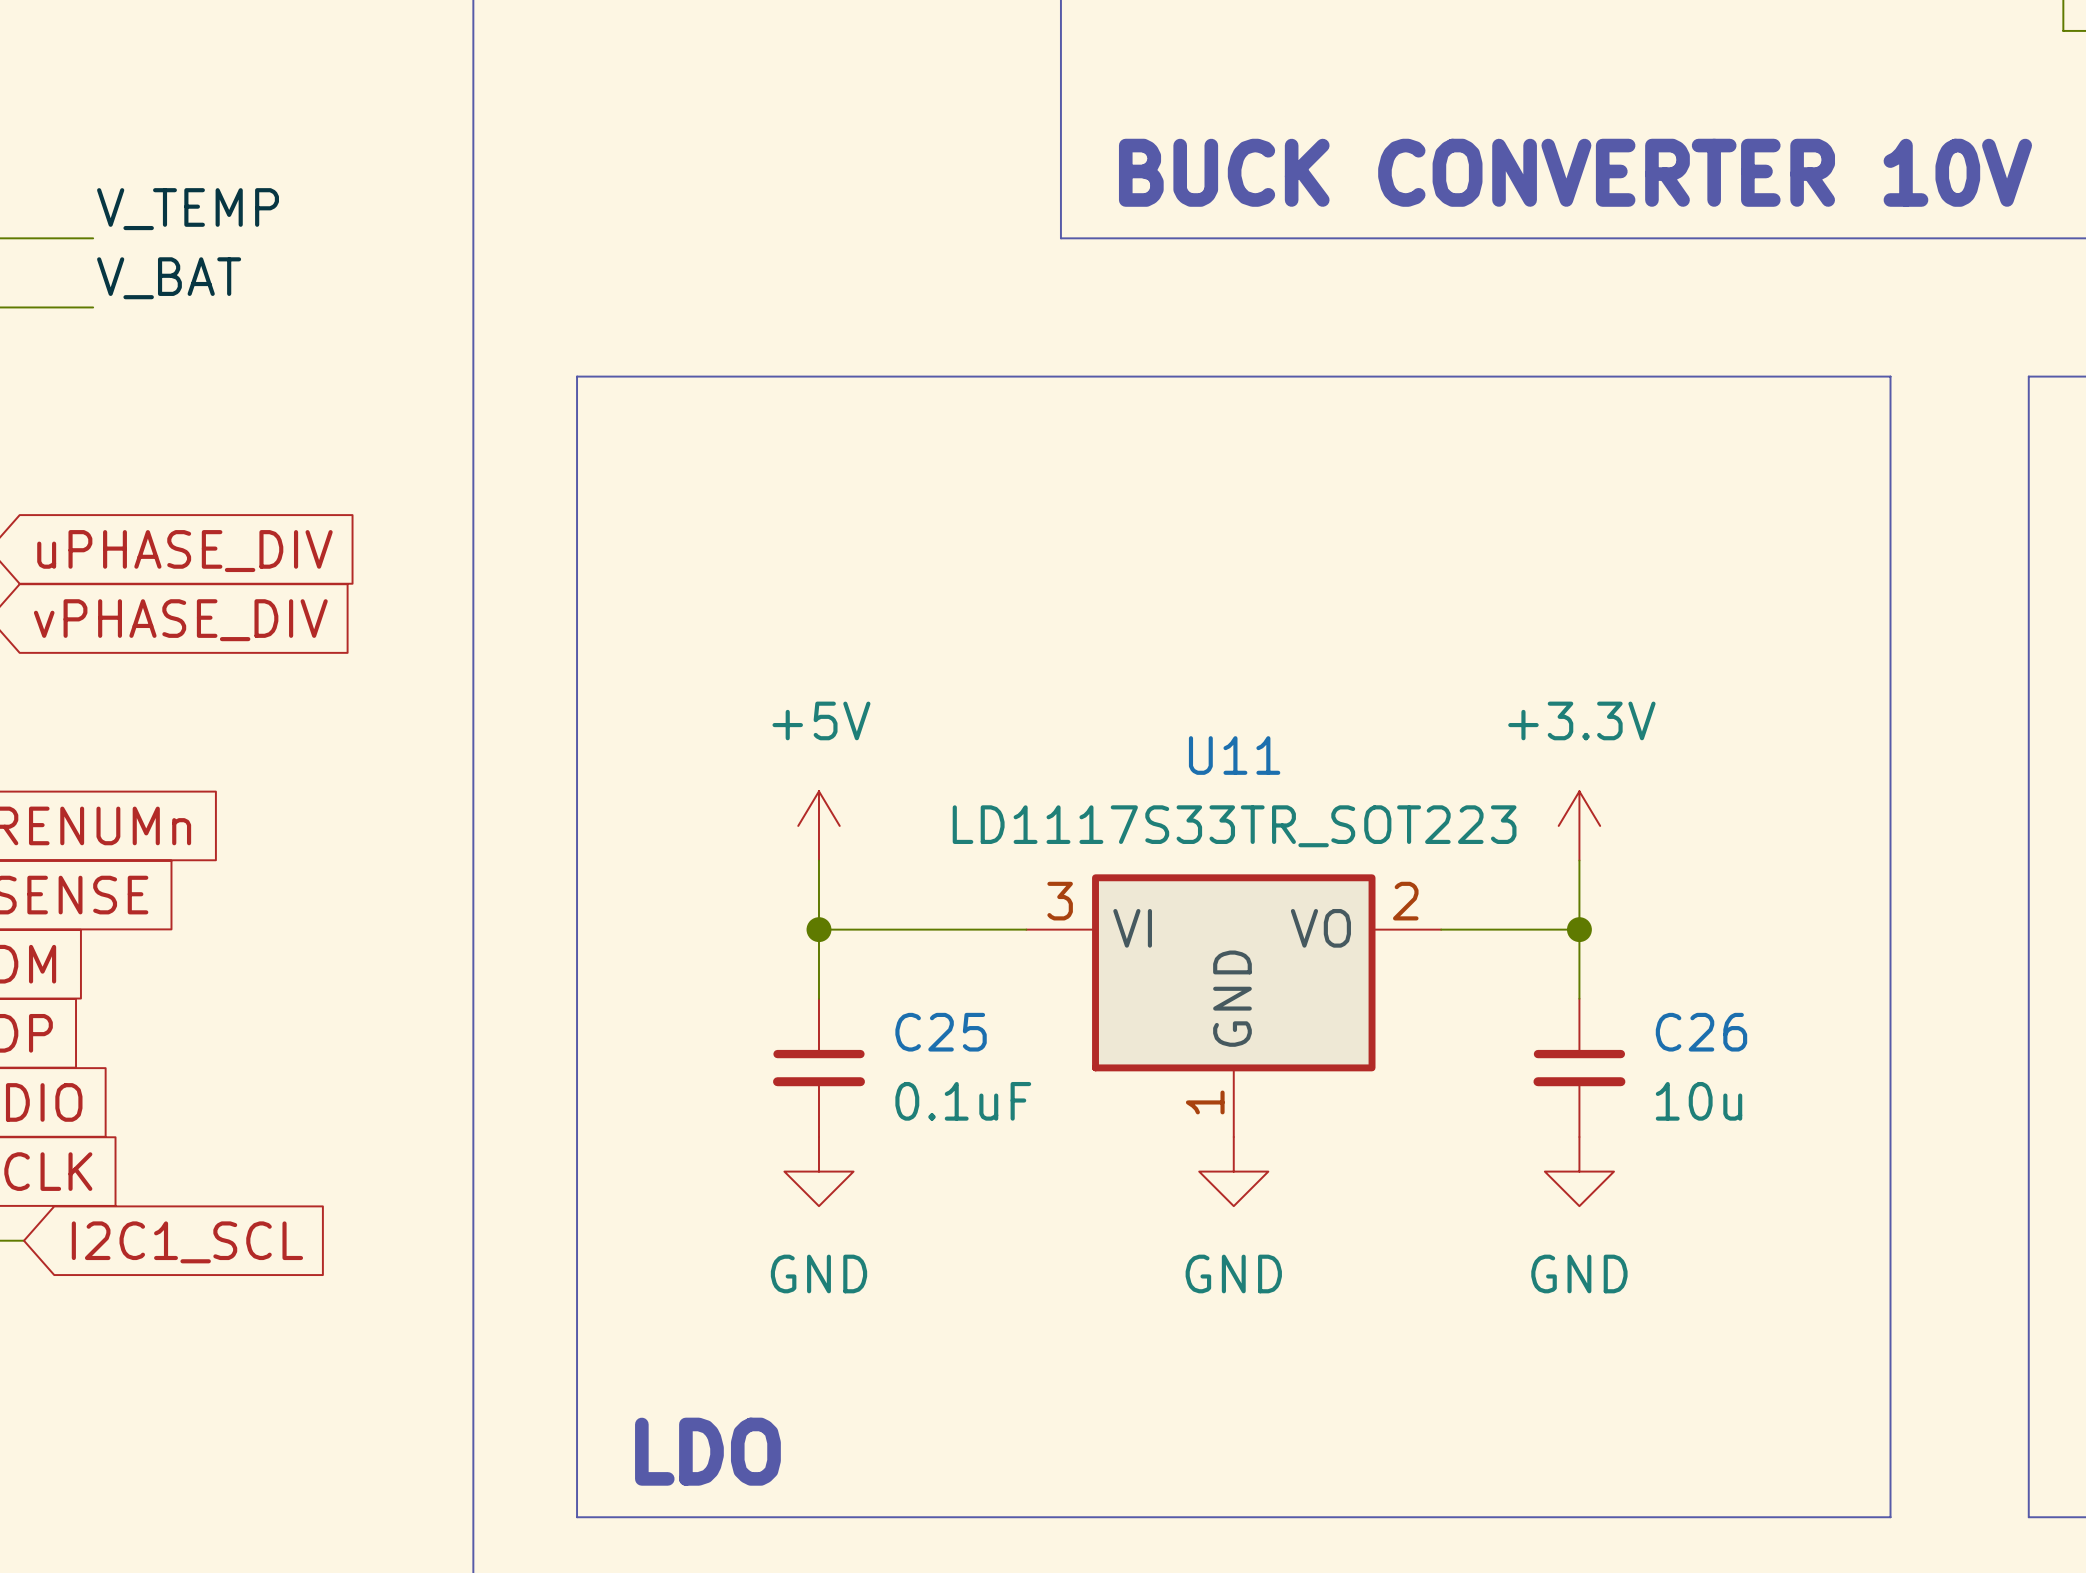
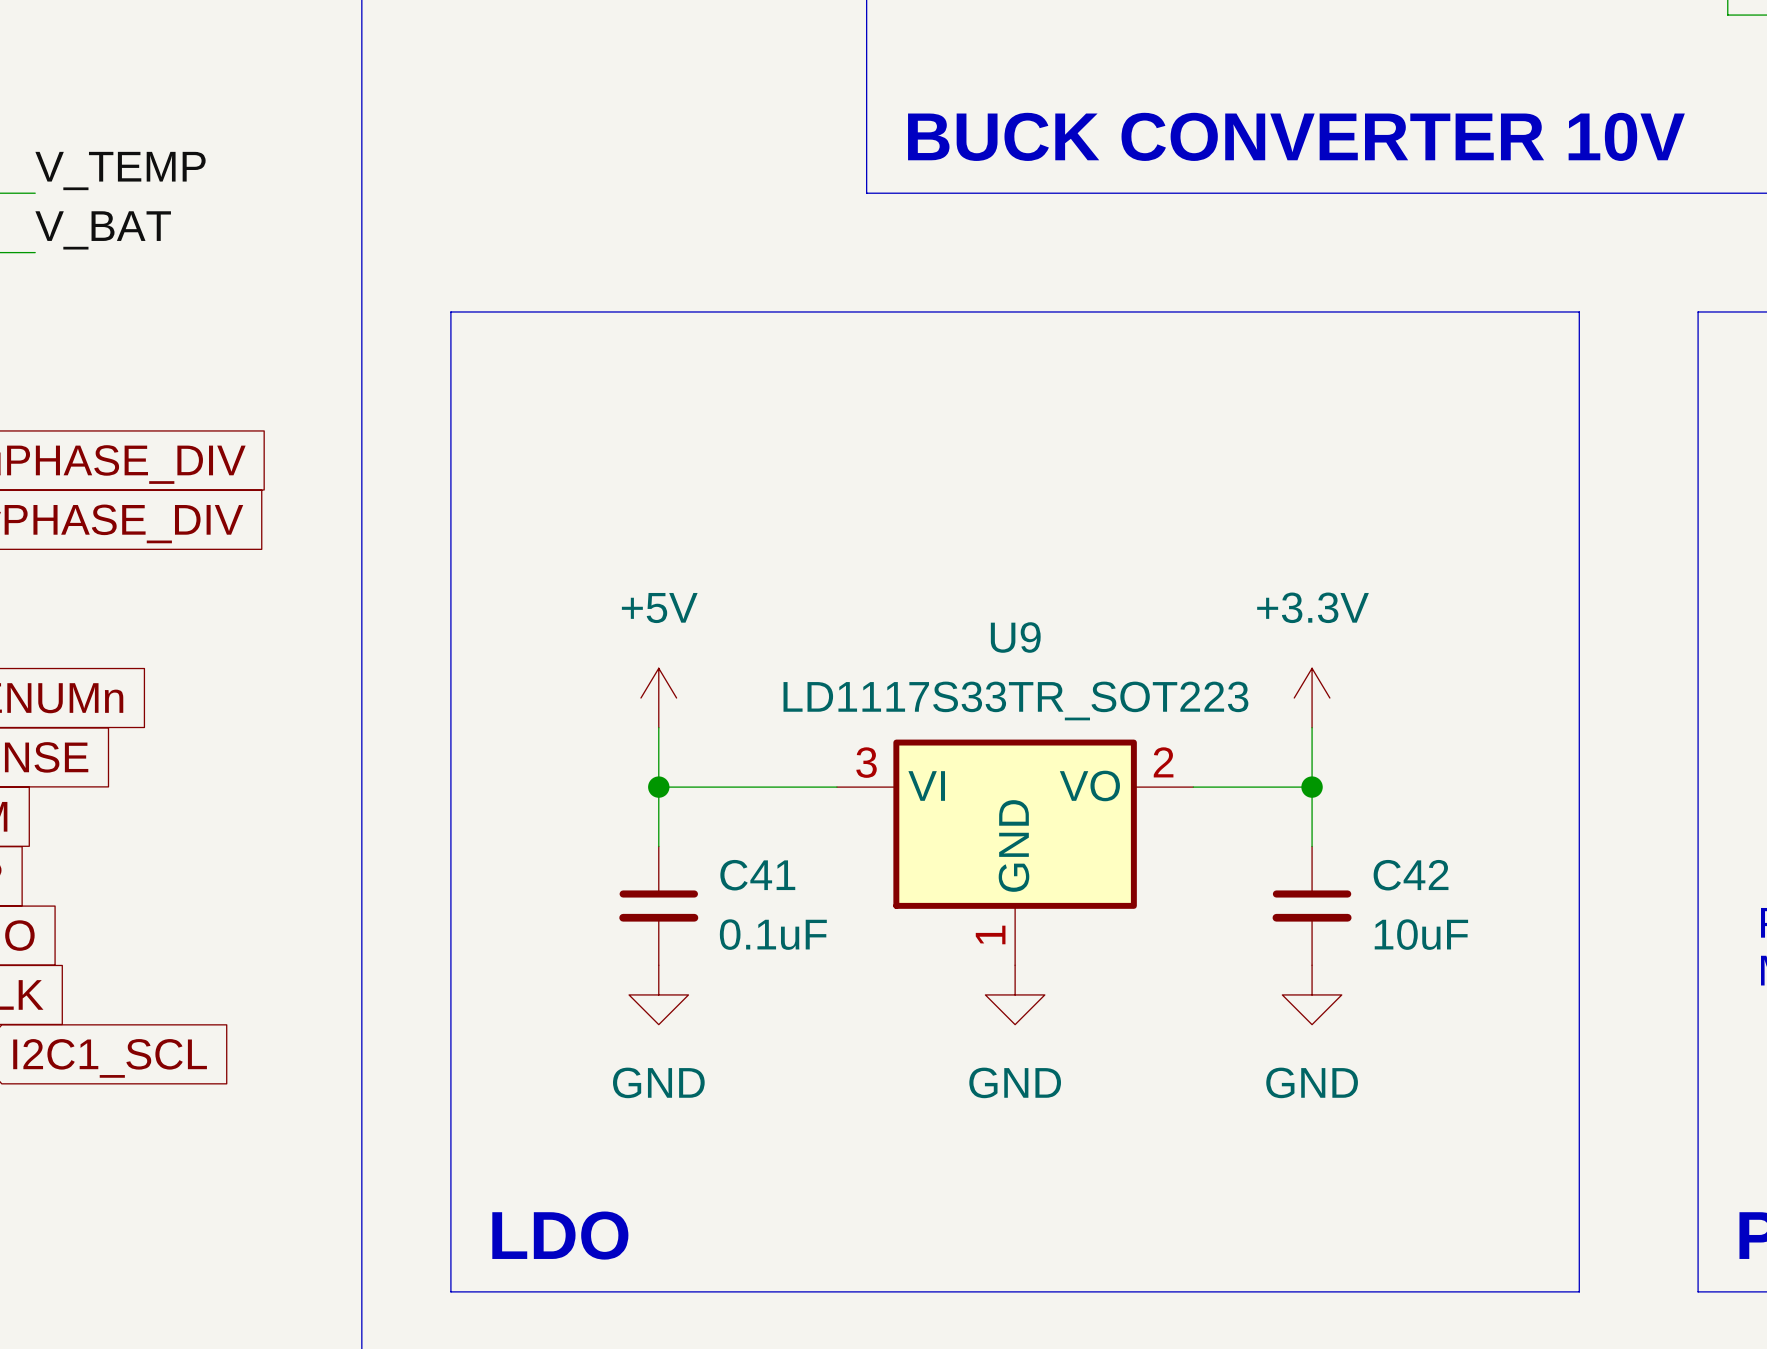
U11 name: U11 (1234, 755) -> U9 (1015, 637)
C25 name: C25 (941, 1032) -> C41 (757, 875)
C26 name: C26 (1701, 1032) -> C42 (1411, 875)
C26 value: 10u (1699, 1101) -> 10uF (1421, 934)

